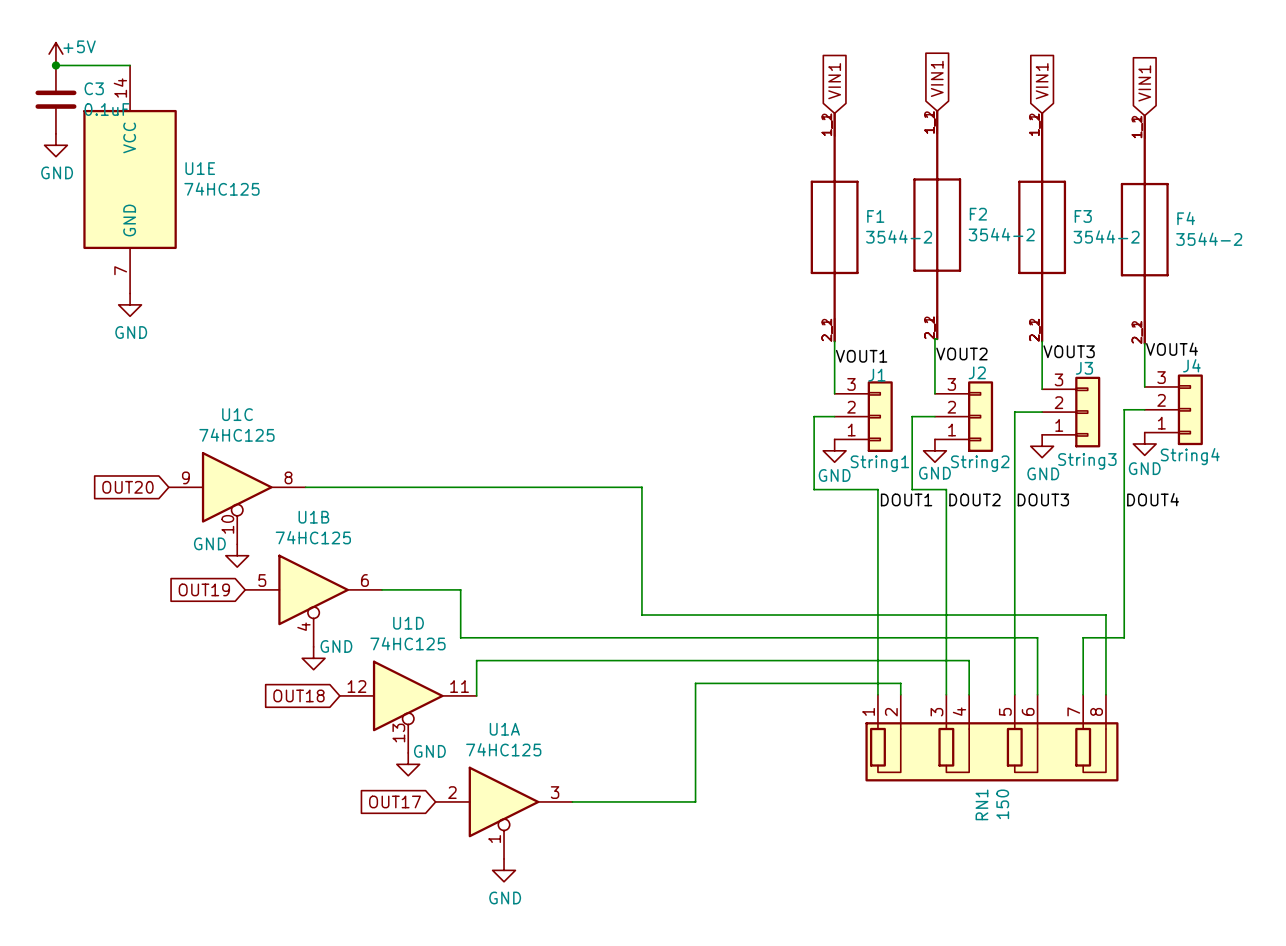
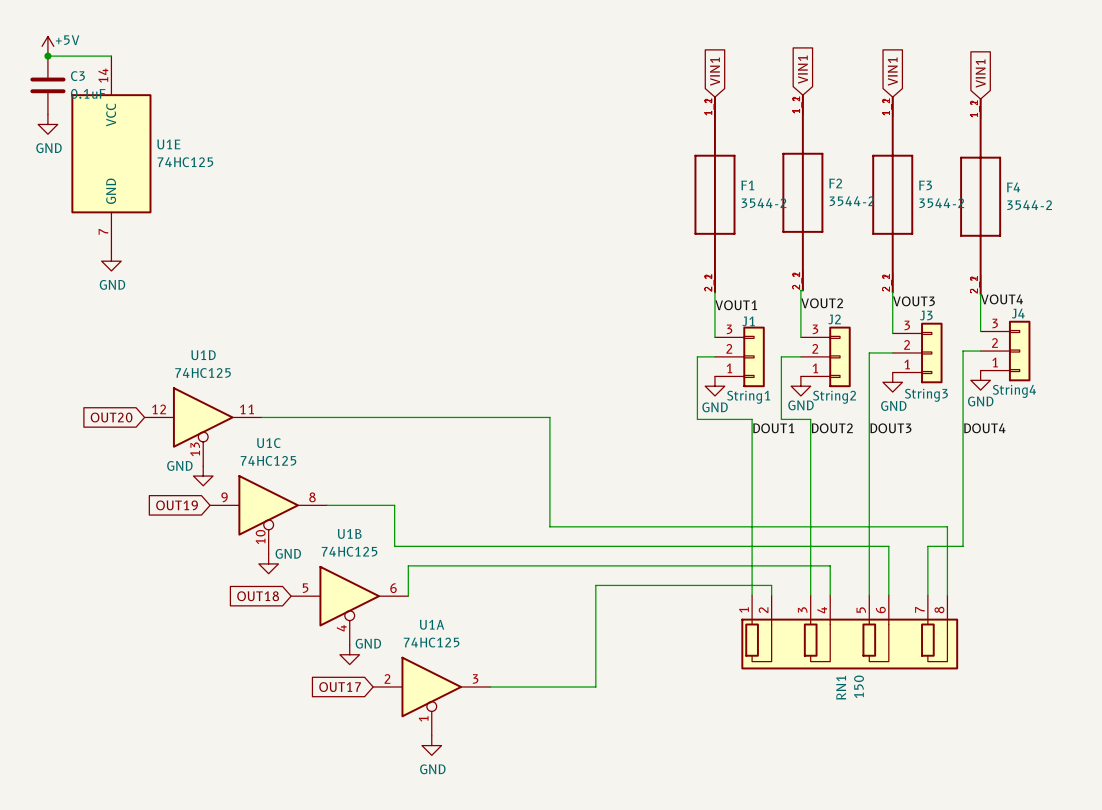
U1C position: (237, 498) -> (268, 514)
U1B position: (313, 600) -> (349, 605)
U1D position: (408, 706) -> (203, 426)

